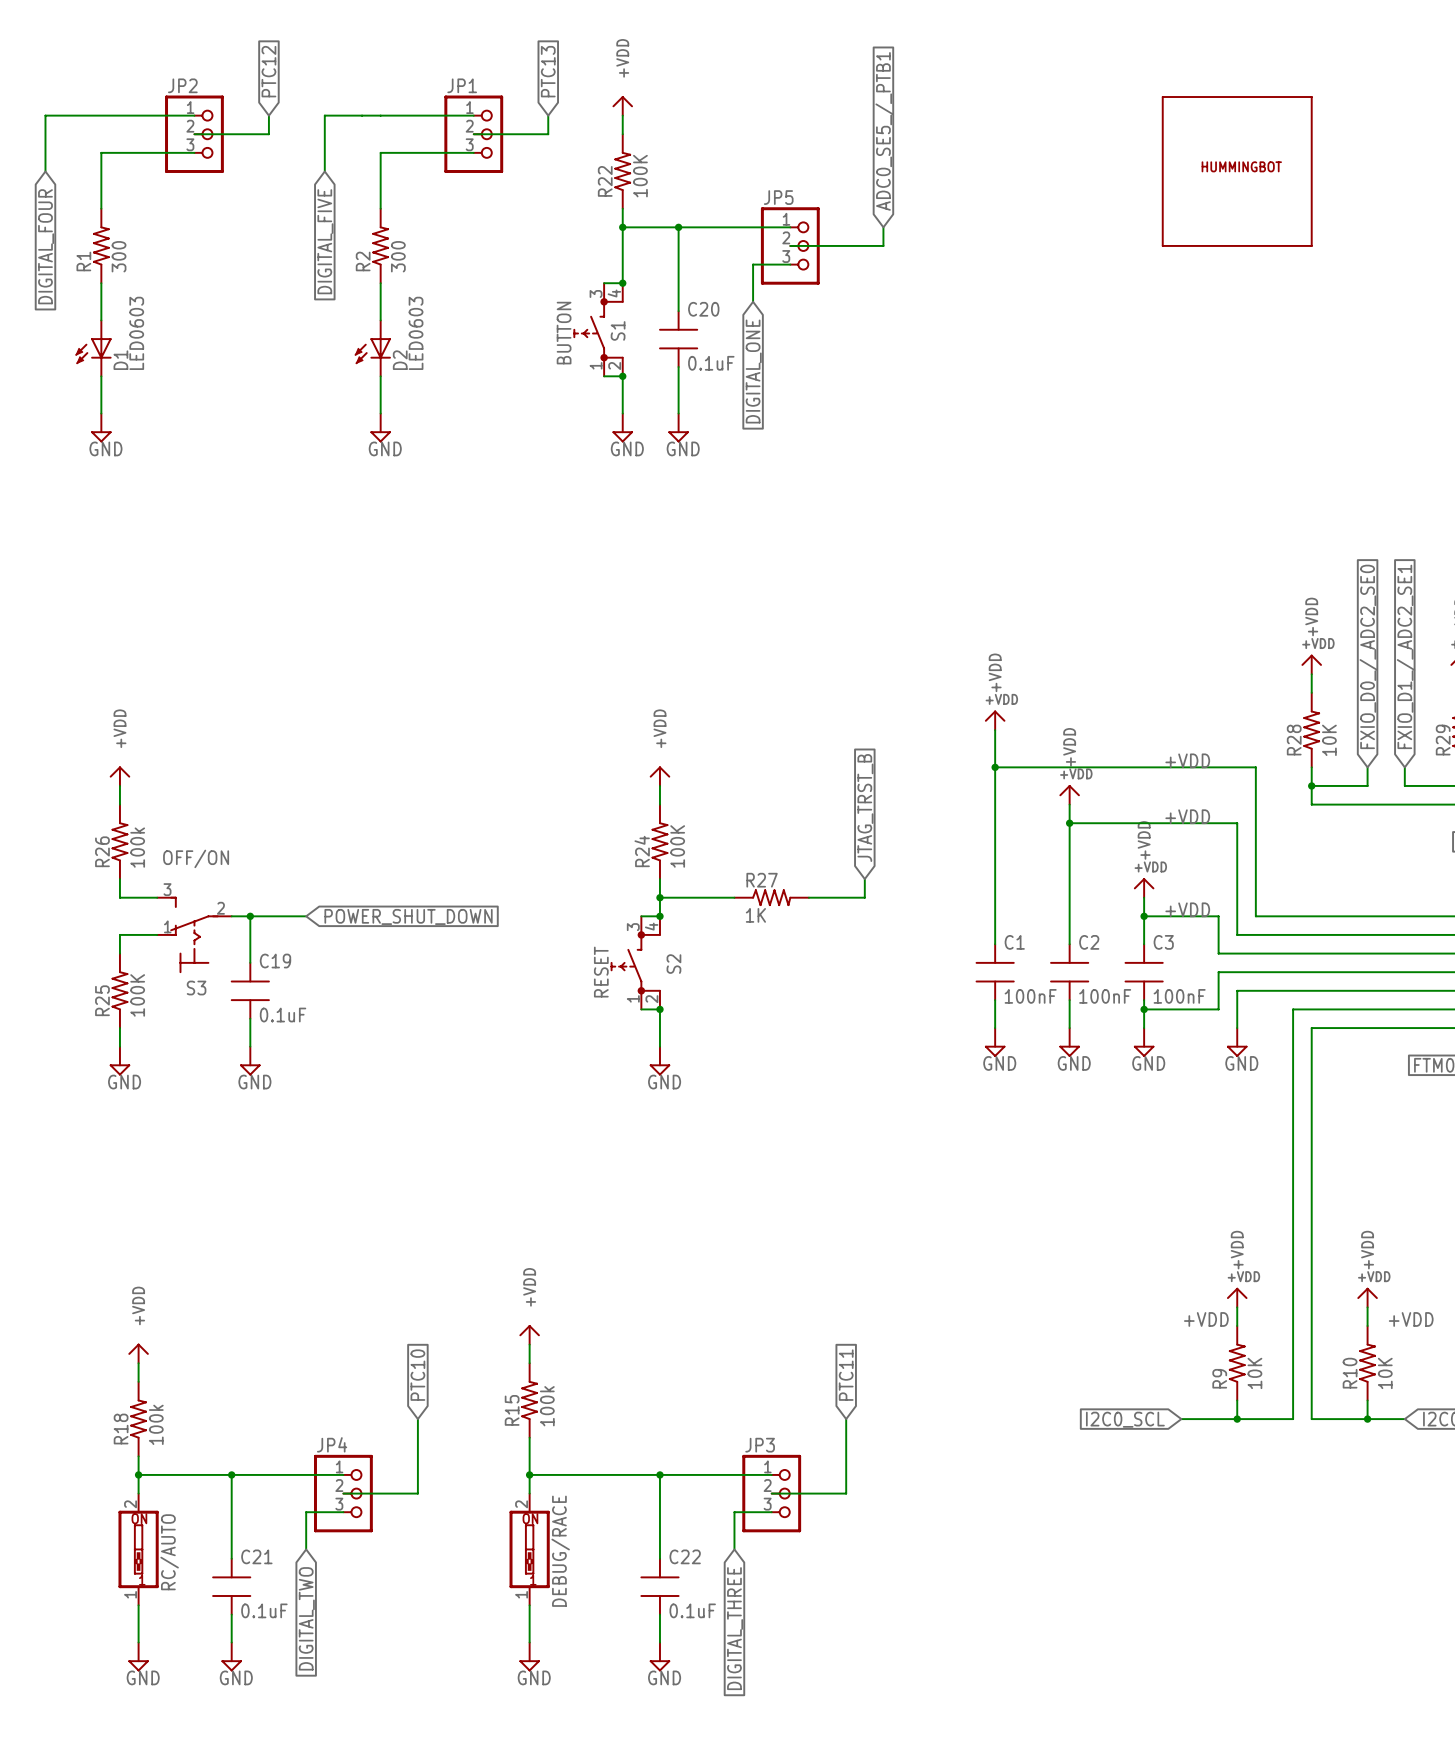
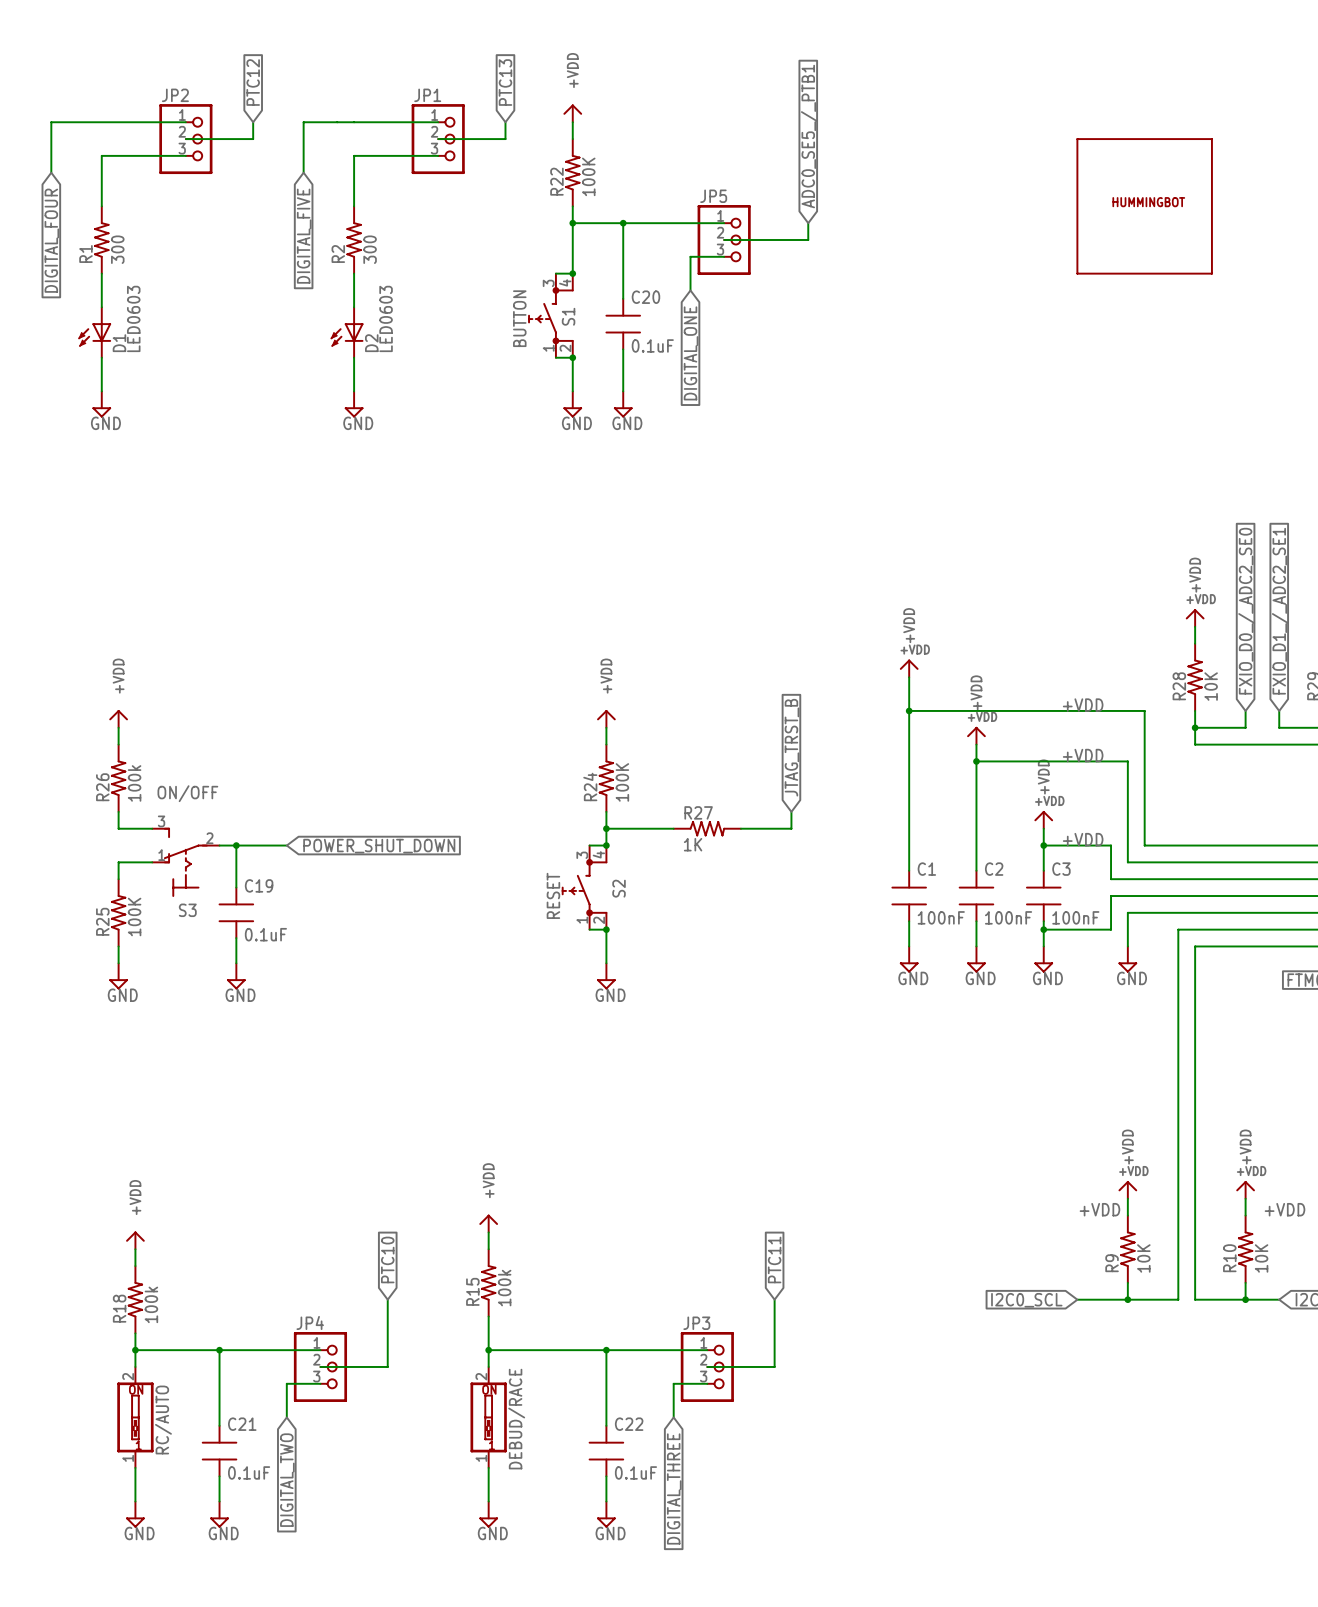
part position: (1237, 171) -> (1144, 206)
S3 value: OFF/ON (196, 858) -> ON/OFF (187, 793)
DEBUG/RACE name: DEBUG/RACE (560, 1551) -> DEBUD/RACE (516, 1419)

